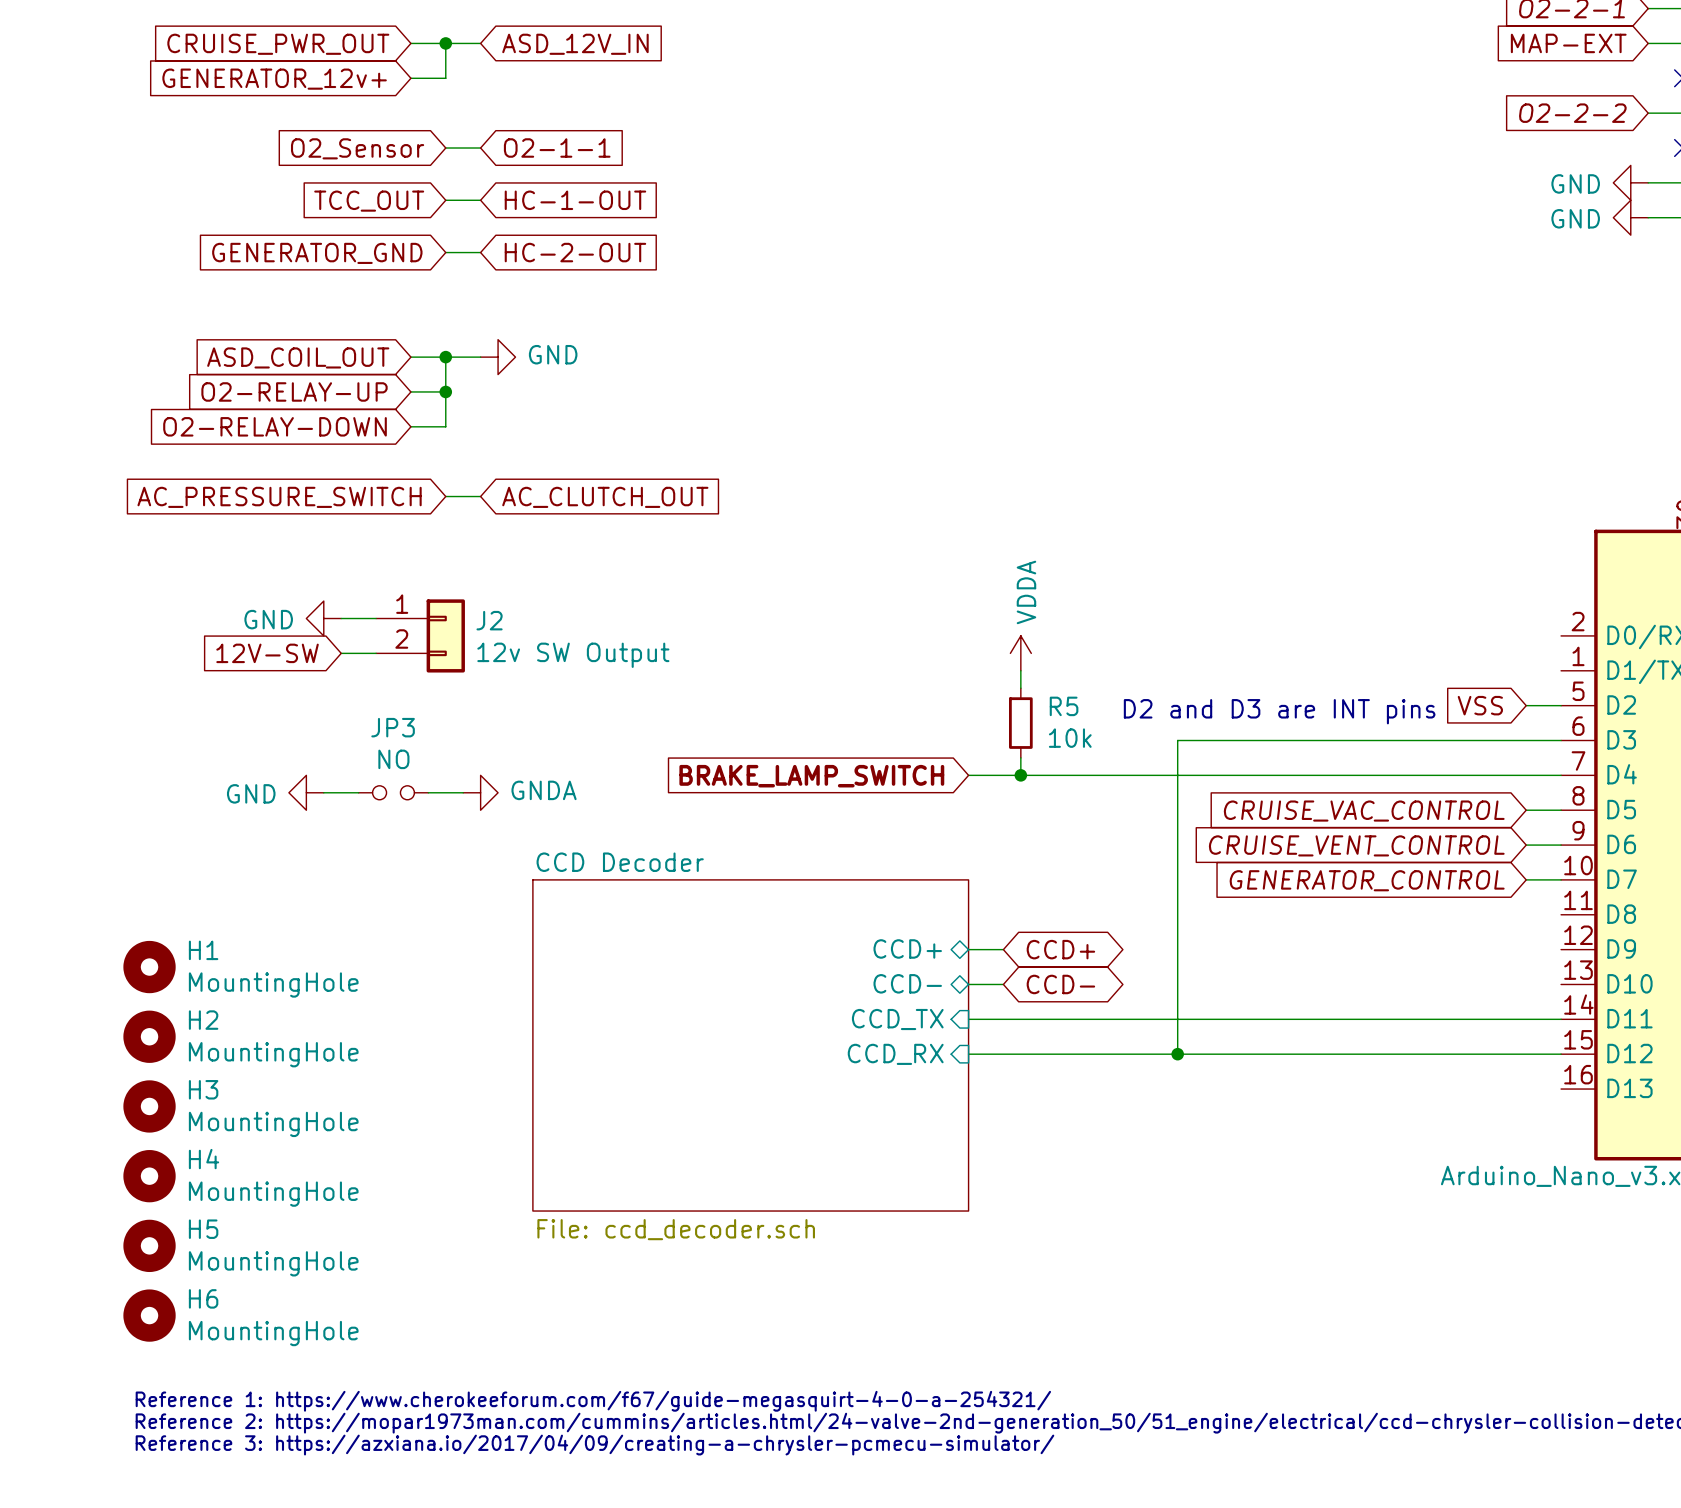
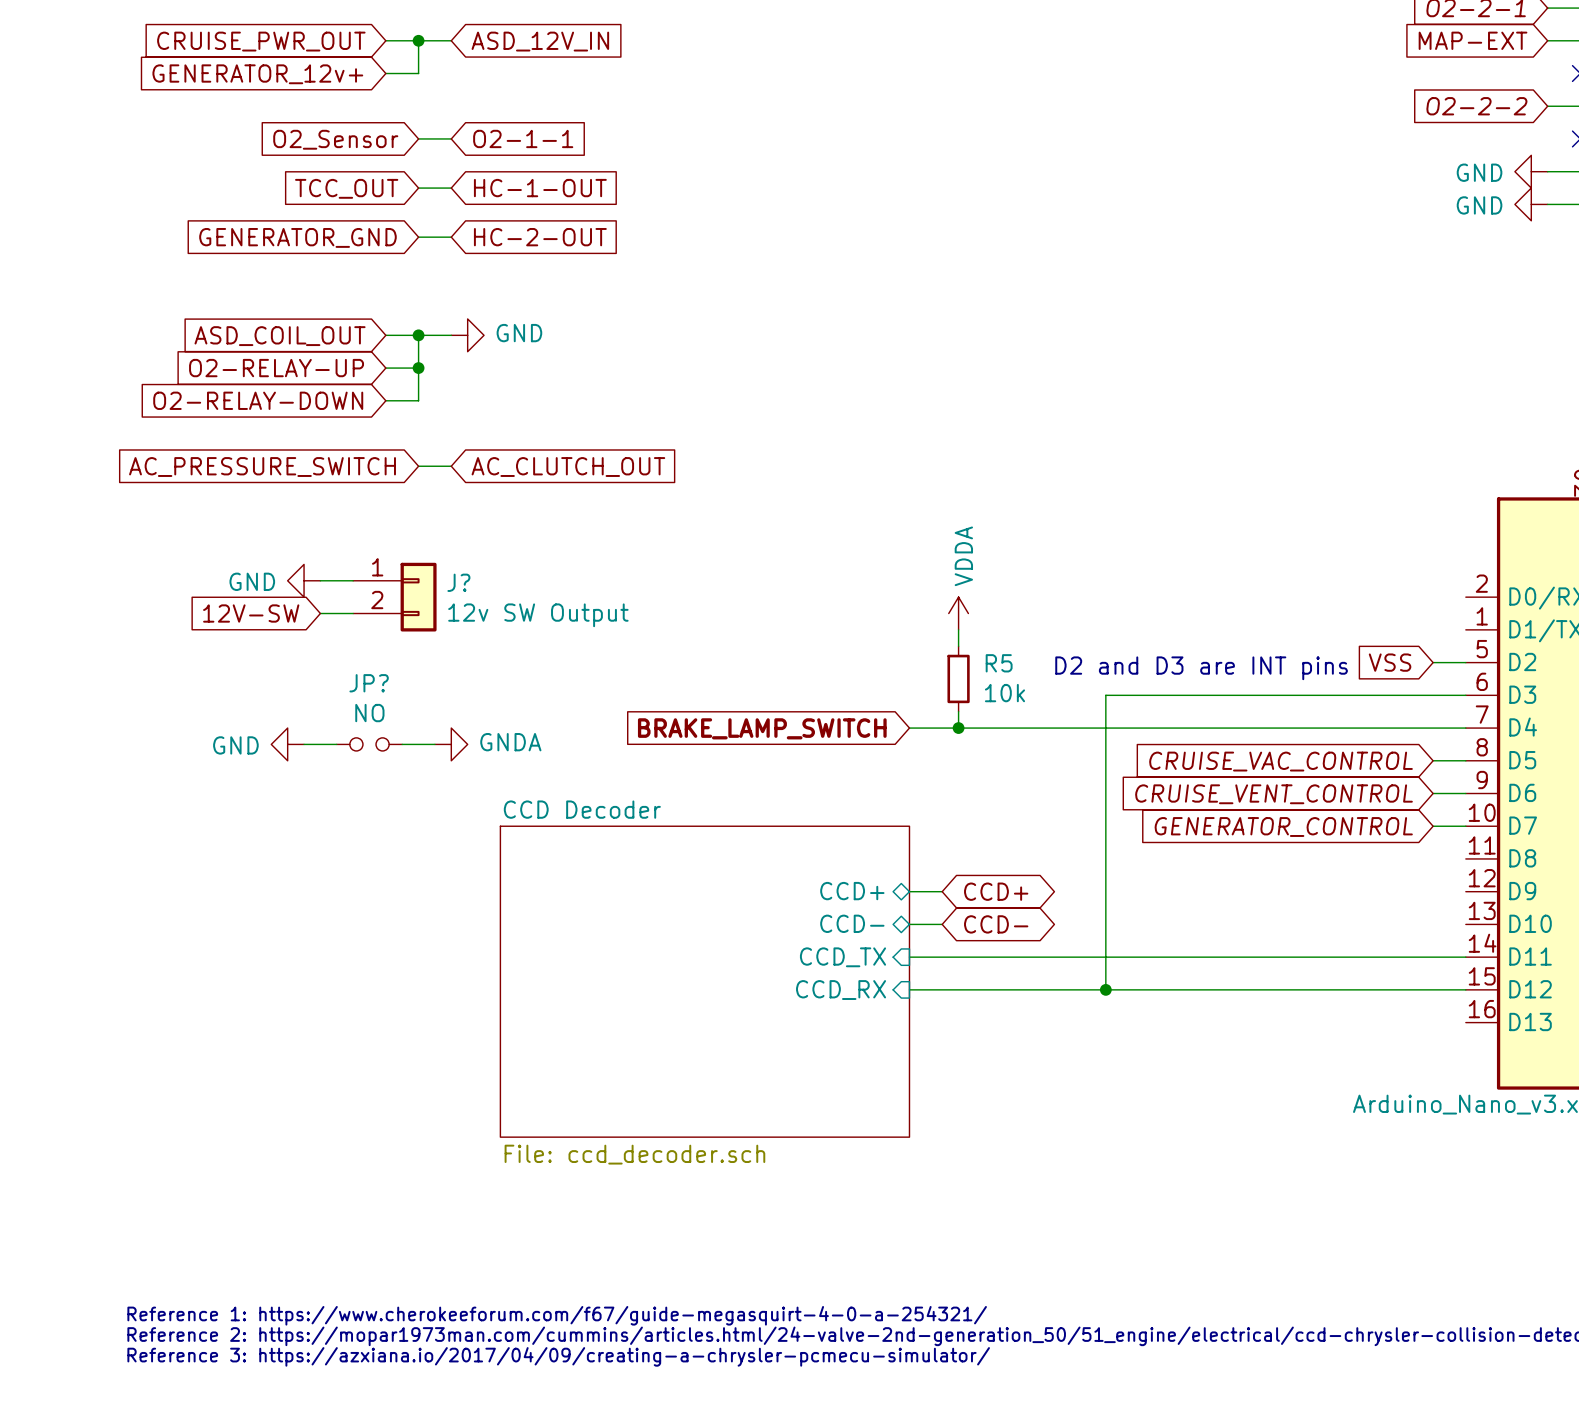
J2 name: J2 (489, 620) -> J? (458, 582)
JP3 name: JP3 (393, 727) -> JP? (369, 683)
H1: MountingHole (149, 967) -> none
H2: MountingHole (149, 1036) -> none
H3: MountingHole (149, 1106) -> none
H4: MountingHole (149, 1176) -> none
H5: MountingHole (149, 1245) -> none
H6: MountingHole (149, 1315) -> none

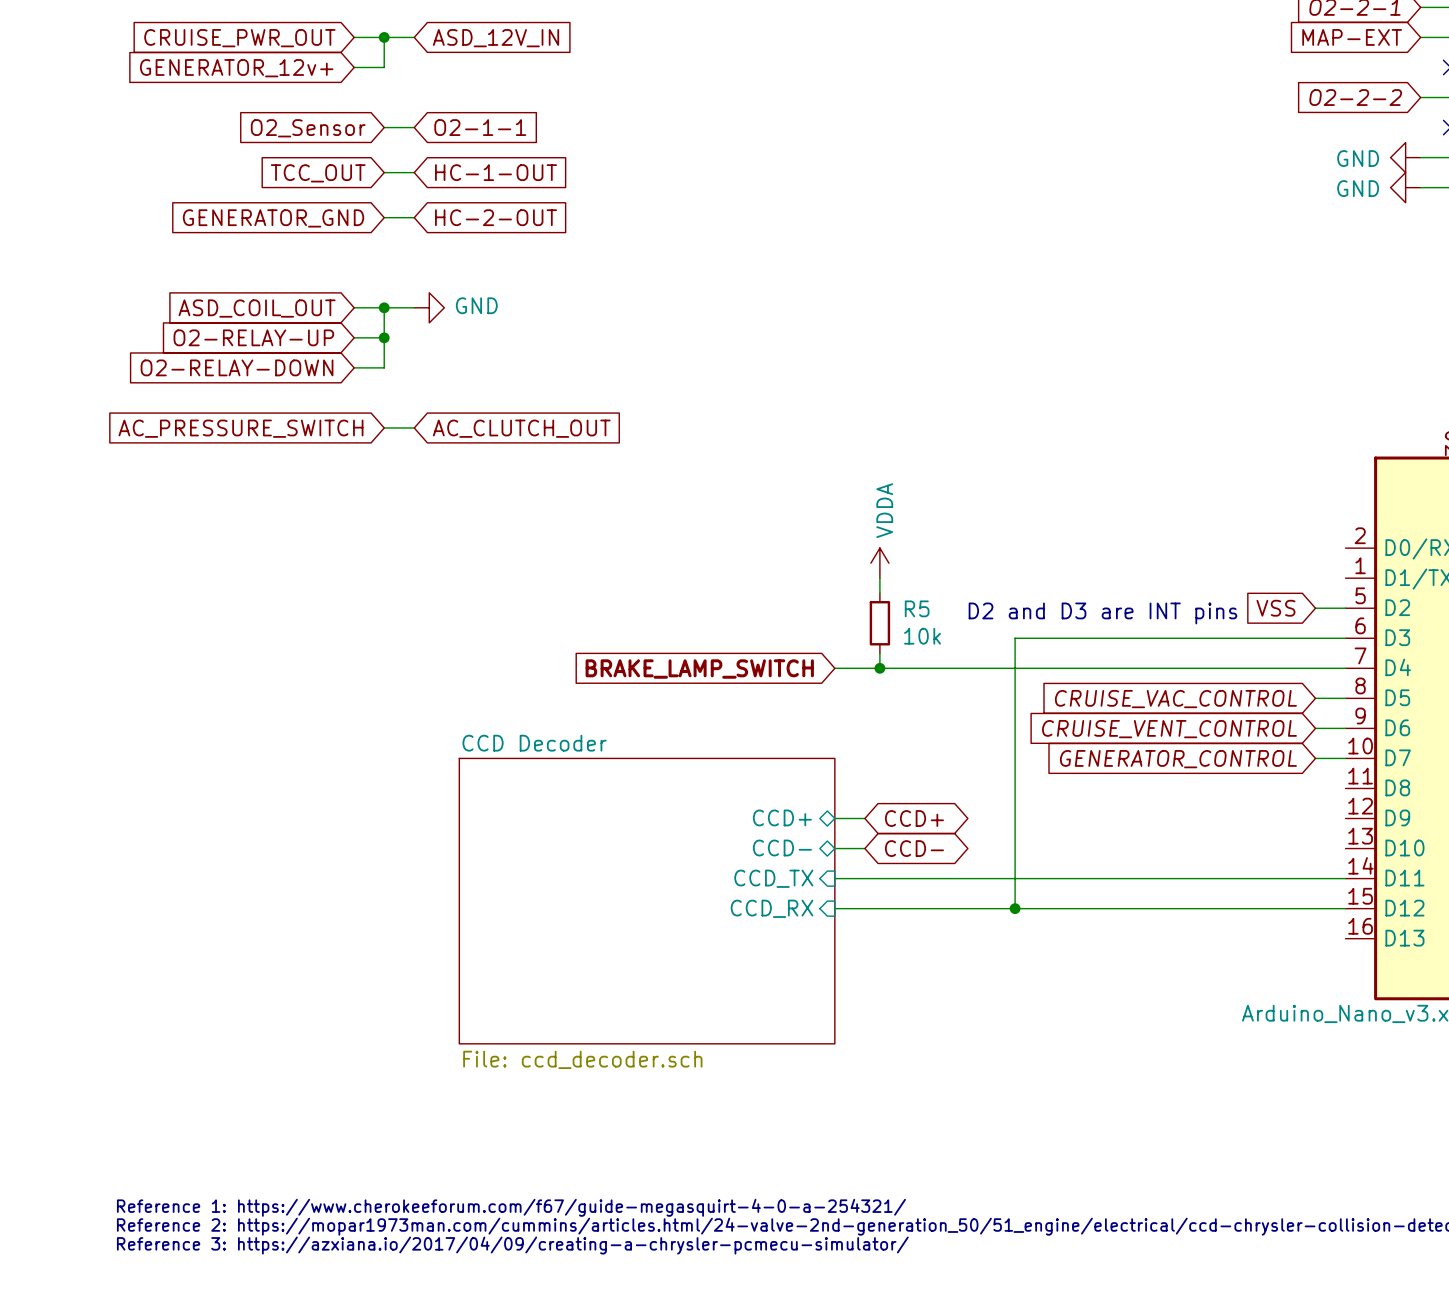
power symbol: GND (304, 580) -> none
wire: (320, 580) (353, 580) -> none
J?: 12v SW Output (394, 597) -> none
global label: 12V-SW (251, 613) -> none
wire: (320, 613) (353, 613) -> none
power symbol: GND (287, 744) -> none
wire: (304, 744) (336, 744) -> none
JP?: NO (369, 744) -> none
wire: (402, 744) (434, 744) -> none
power symbol: GNDA (451, 744) -> none

